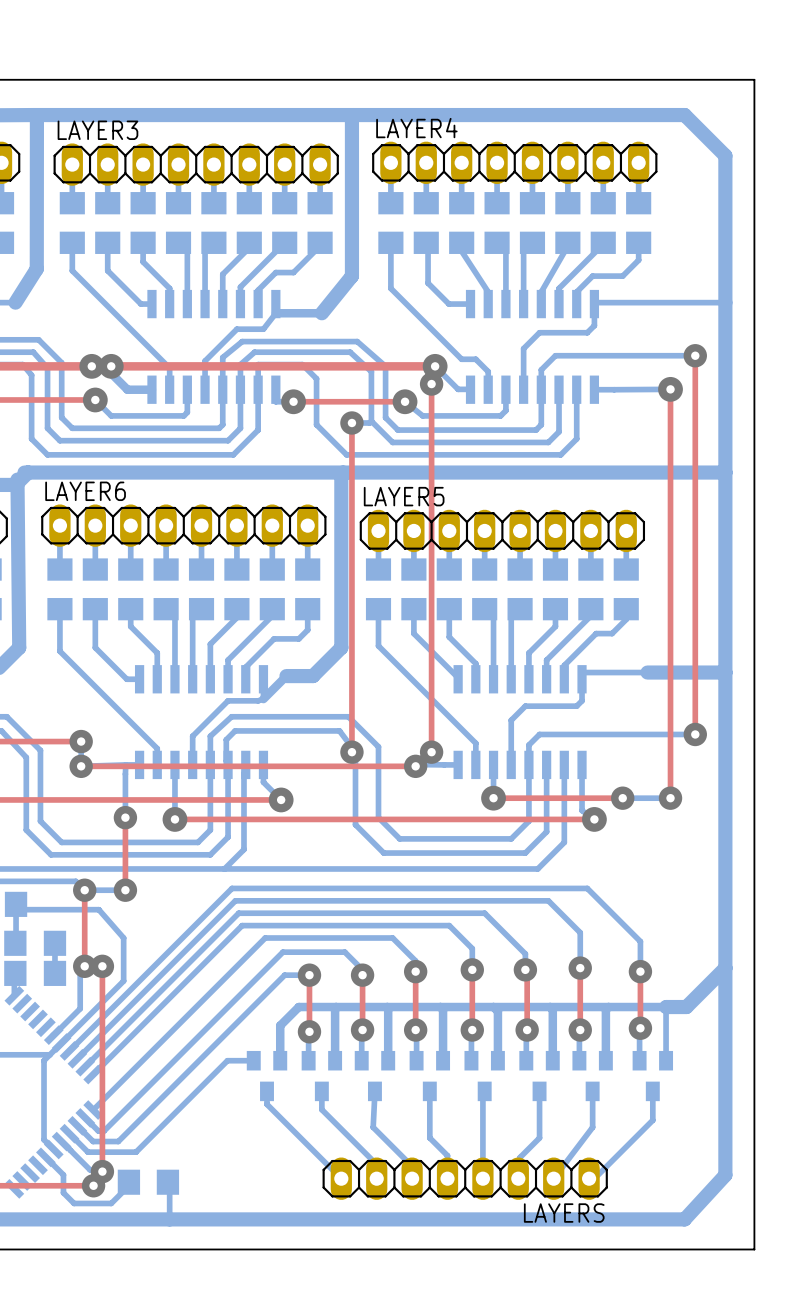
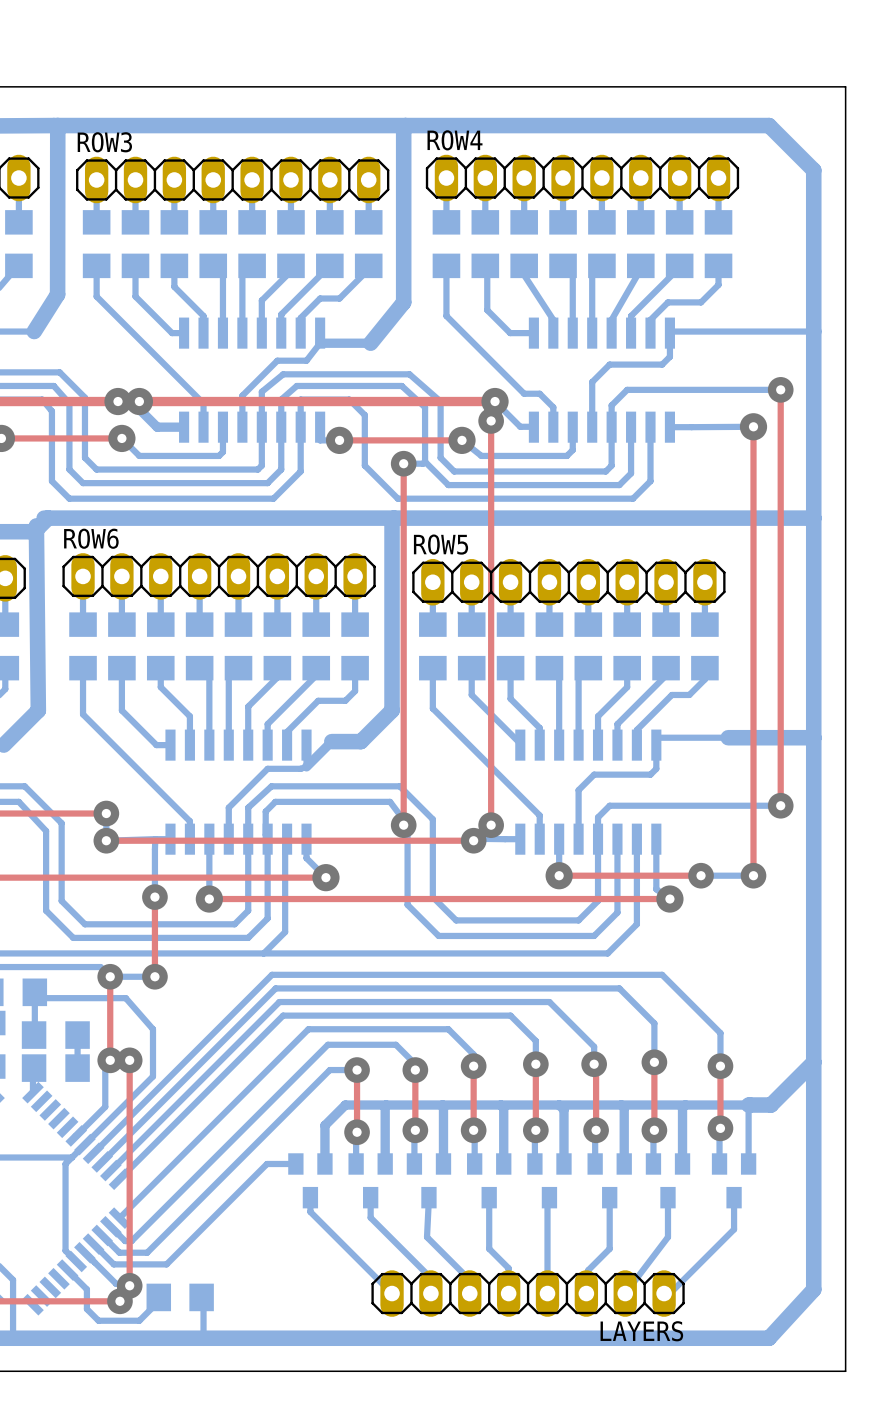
LAYER4 name: LAYER4 (416, 128) -> ROW4 (455, 140)
LAYER3 name: LAYER3 (97, 130) -> ROW3 (104, 142)
LAYER6 name: LAYER6 (85, 491) -> ROW6 (91, 538)
LAYER5 name: LAYER5 (404, 496) -> ROW5 (441, 544)

